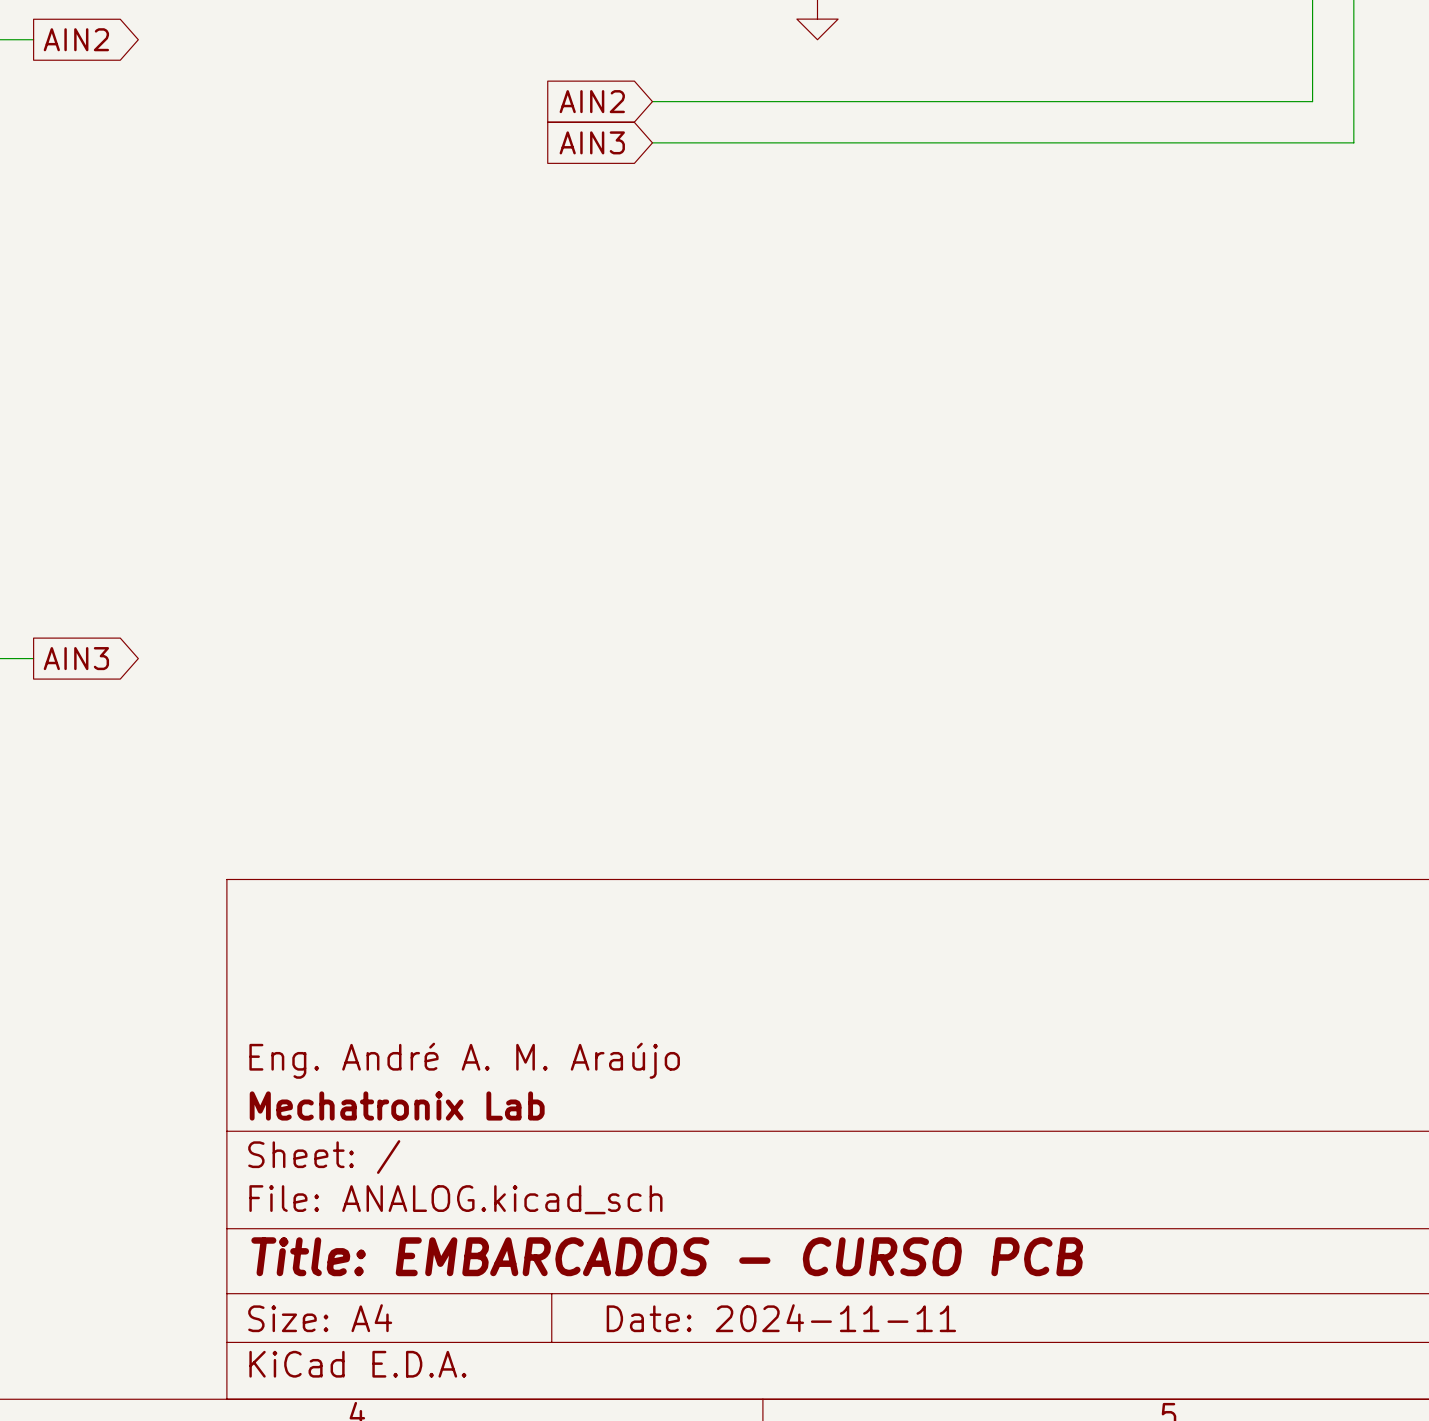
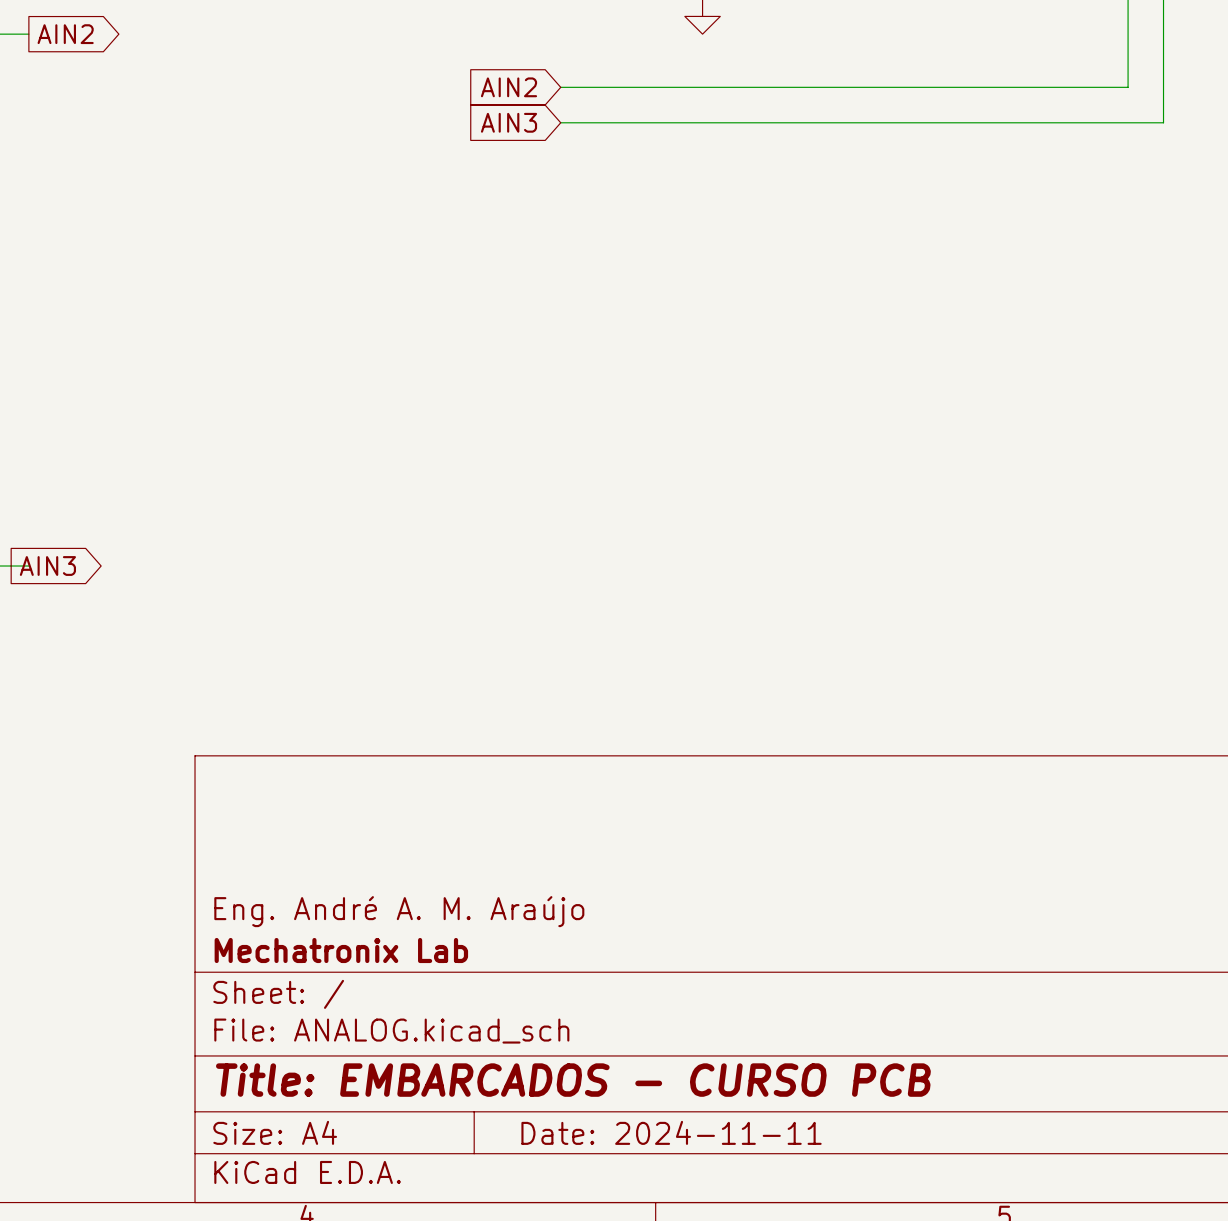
global label position: AIN3 (76, 658) -> AIN3 (47, 566)

